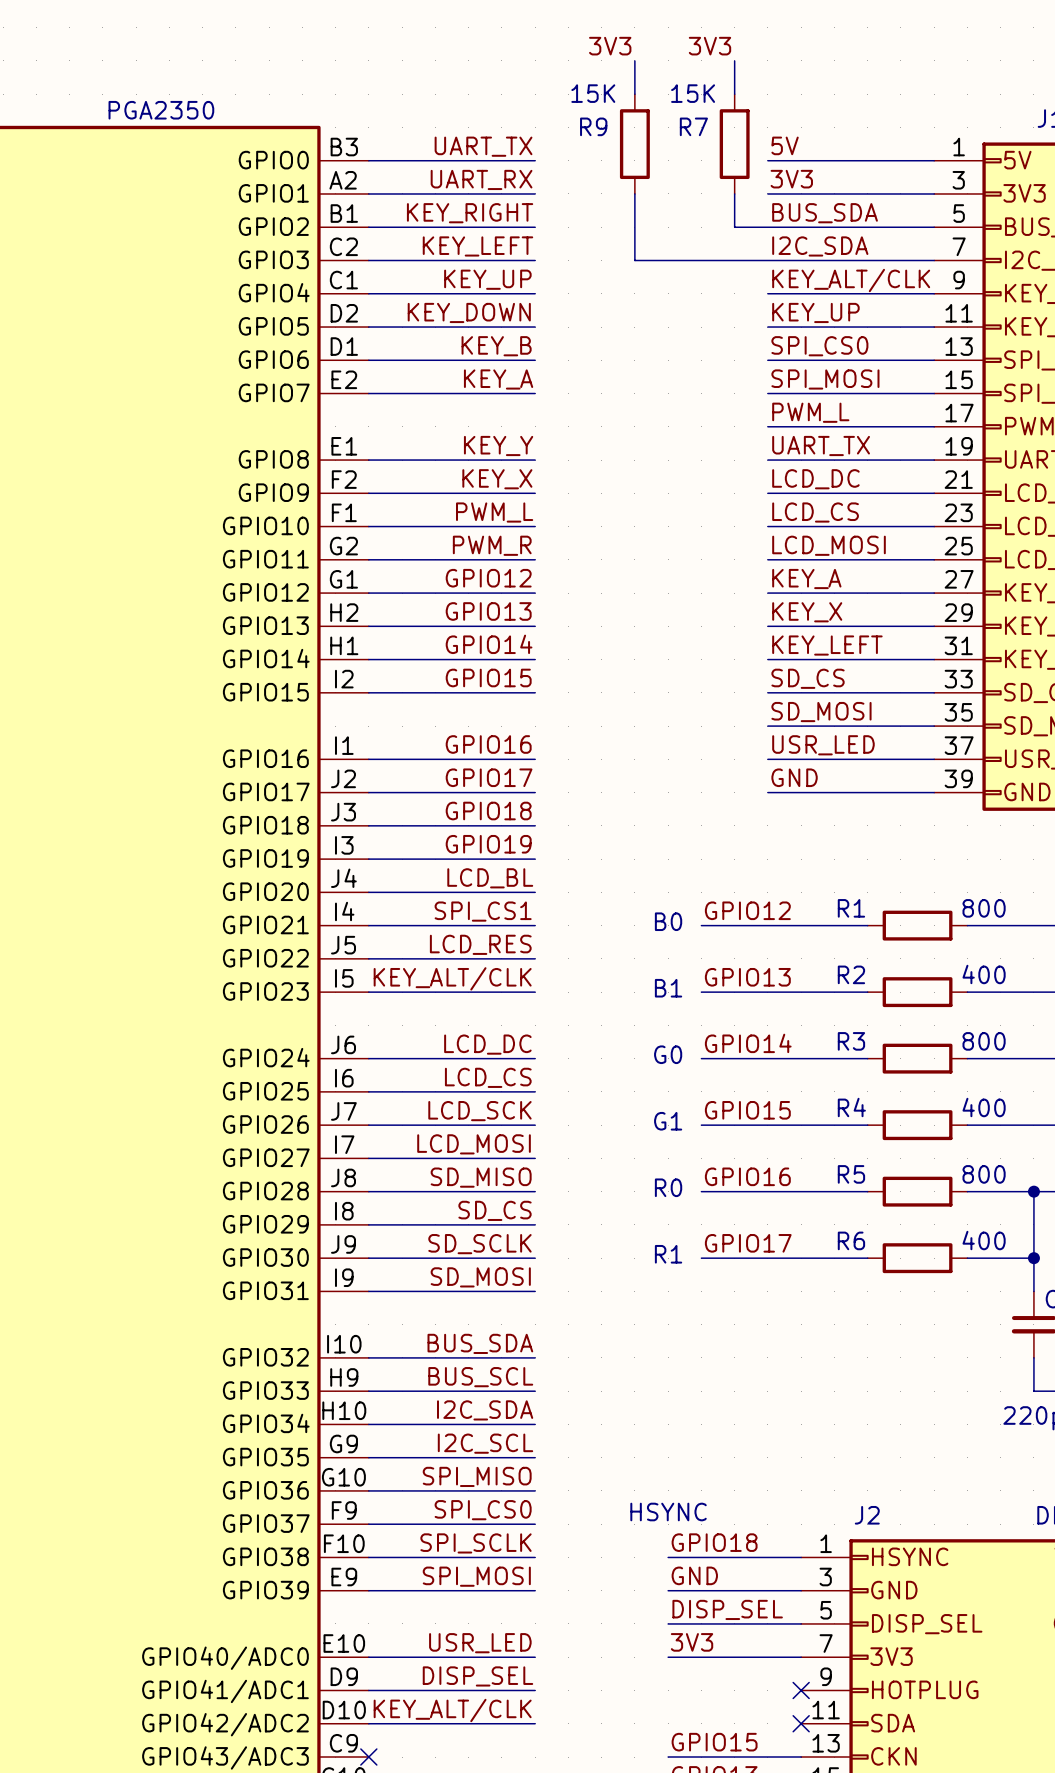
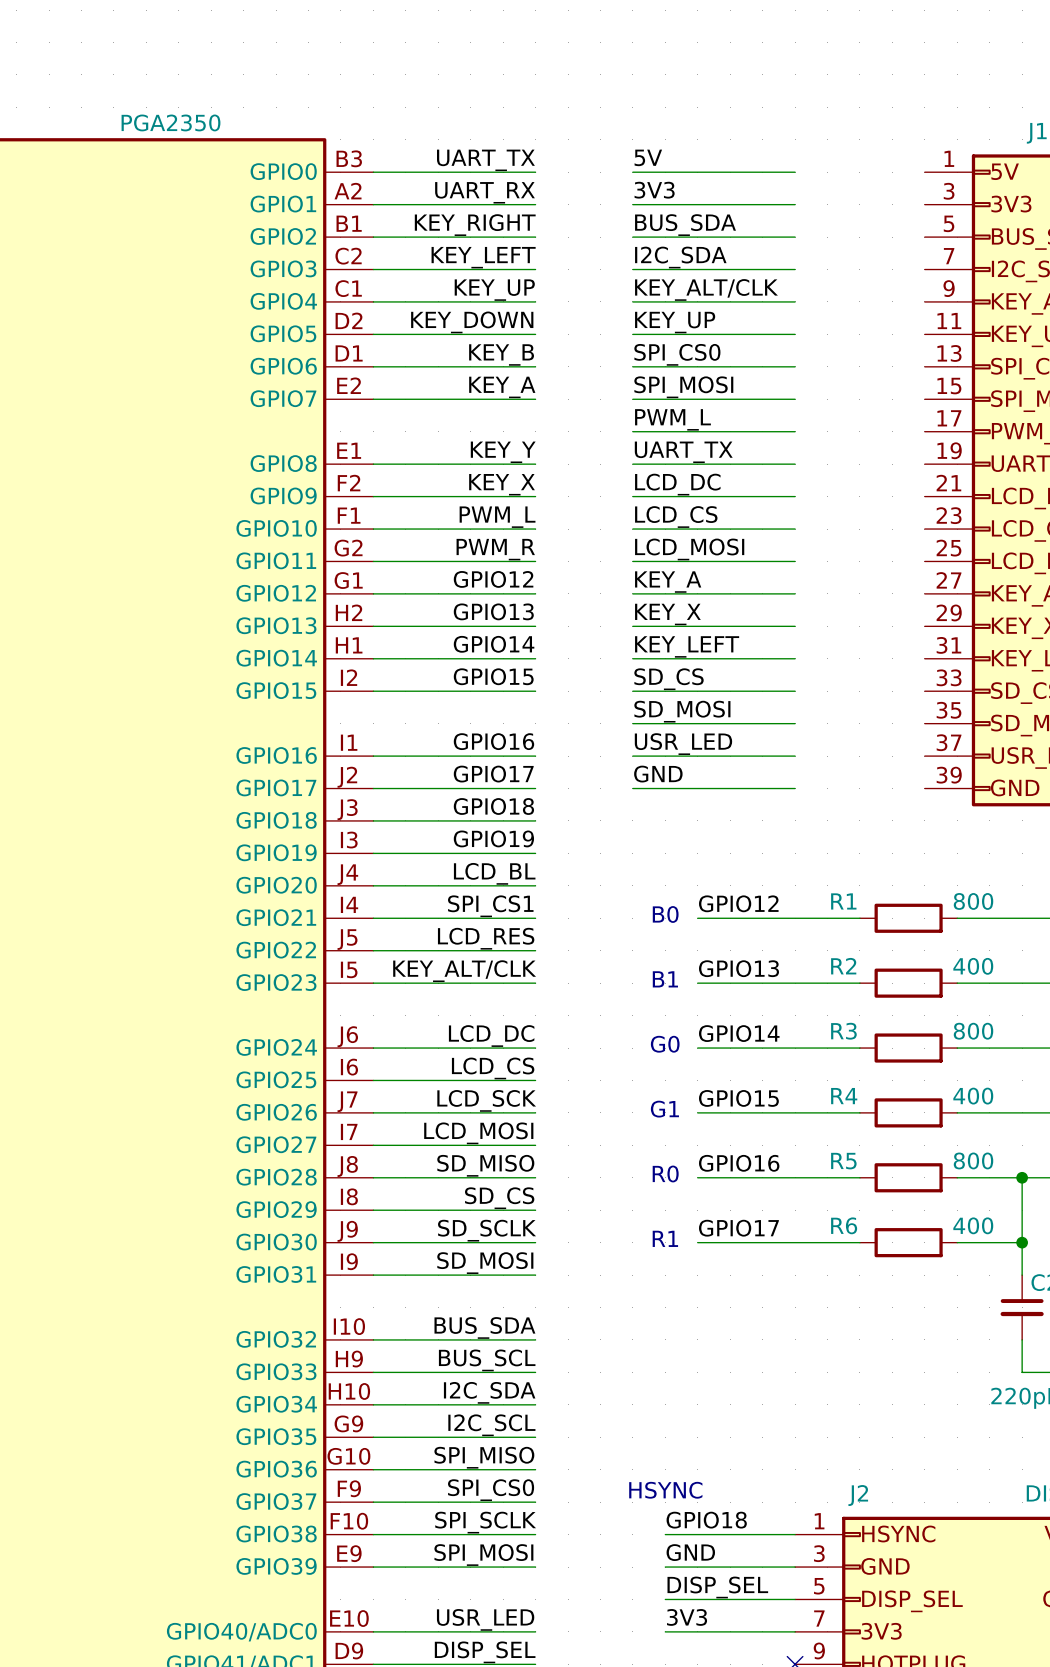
label: 3V3 (610, 46) -> none
label: 3V3 (709, 46) -> none
wire: (634, 60) (634, 94) -> none
wire: (734, 60) (734, 94) -> none
R9: 15K (634, 144) -> none
R7: 15K (734, 144) -> none
label position: 5V (785, 145) -> 5V (648, 157)
wire: (801, 160) (934, 160) -> (632, 172) (762, 172)
label: none -> 3V3 (654, 190)
label: 3V3 (791, 179) -> none
wire: (634, 193) (634, 260) -> (632, 204) (762, 204)
wire: (734, 193) (734, 227) -> (632, 237) (730, 237)
wire: (801, 193) (934, 193) -> none
label position: BUS_SDA (825, 213) -> BUS_SDA (685, 225)
wire: (801, 227) (934, 227) -> none
label position: I2C_SDA (820, 246) -> I2C_SDA (680, 257)
wire: (801, 260) (934, 260) -> none
label position: KEY_ALT/CLK (851, 280) -> KEY_ALT/CLK (706, 289)
wire: (801, 293) (934, 293) -> (632, 301) (762, 301)
label position: KEY_UP (815, 312) -> KEY_UP (675, 322)
wire: (801, 327) (934, 327) -> (632, 334) (762, 334)
label position: SPI_CS0 (819, 346) -> SPI_CS0 (677, 354)
wire: (801, 360) (934, 360) -> (632, 366) (762, 366)
label position: SPI_MOSI (825, 379) -> SPI_MOSI (683, 387)
wire: (801, 393) (934, 393) -> (632, 399) (762, 399)
label position: PWM_L (810, 412) -> PWM_L (672, 419)
wire: (801, 426) (934, 426) -> (632, 431) (762, 431)
label position: UART_TX (821, 445) -> UART_TX (683, 452)
wire: (801, 460) (934, 460) -> (632, 464) (762, 464)
label position: LCD_DC (815, 479) -> LCD_DC (677, 484)
wire: (801, 493) (934, 493) -> (632, 496) (762, 496)
label position: LCD_CS (815, 512) -> LCD_CS (676, 517)
wire: (801, 526) (934, 526) -> (632, 529) (762, 529)
label position: LCD_MOSI (829, 545) -> LCD_MOSI (689, 549)
wire: (801, 559) (934, 559) -> (632, 561) (762, 561)
label position: KEY_A (806, 579) -> KEY_A (668, 582)
wire: (801, 593) (934, 593) -> (632, 593) (762, 593)
label position: KEY_X (807, 612) -> KEY_X (667, 614)
wire: (801, 626) (934, 626) -> (632, 626) (762, 626)
label position: KEY_LEFT (827, 645) -> KEY_LEFT (687, 646)
wire: (801, 659) (934, 659) -> (632, 658) (762, 658)
label position: SD_CS (808, 678) -> SD_CS (669, 679)
wire: (801, 692) (934, 692) -> (632, 691) (762, 691)
label position: SD_MOSI (821, 712) -> SD_MOSI (682, 711)
wire: (801, 726) (934, 726) -> (632, 723) (762, 723)
label position: USR_LED (823, 745) -> USR_LED (683, 744)
wire: (801, 759) (934, 759) -> (632, 756) (762, 756)
label position: GND (794, 777) -> GND (658, 774)
wire: (801, 792) (934, 792) -> (632, 788) (762, 788)

